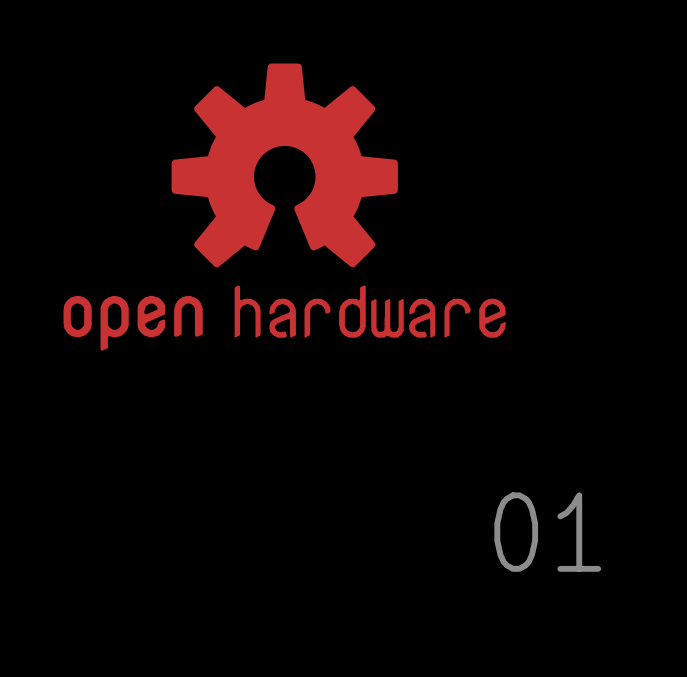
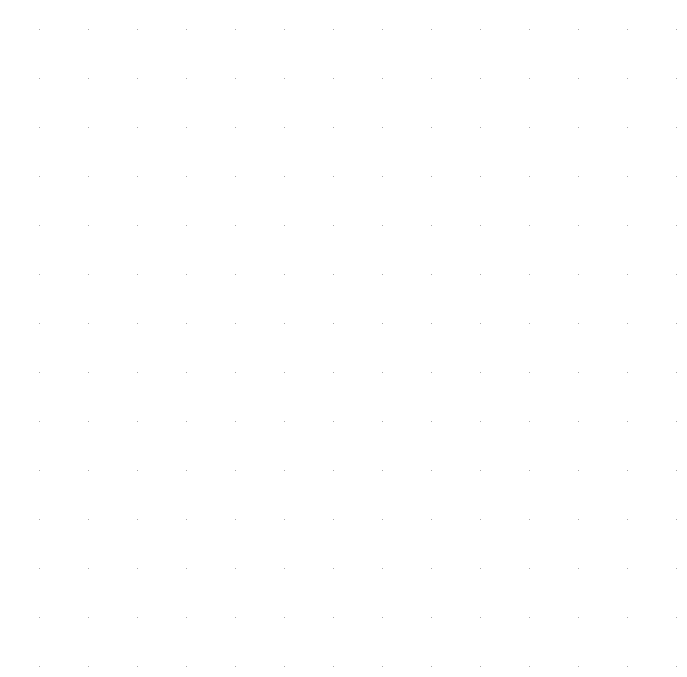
part: (284, 207) -> none
text: 01 (547, 532) -> none

